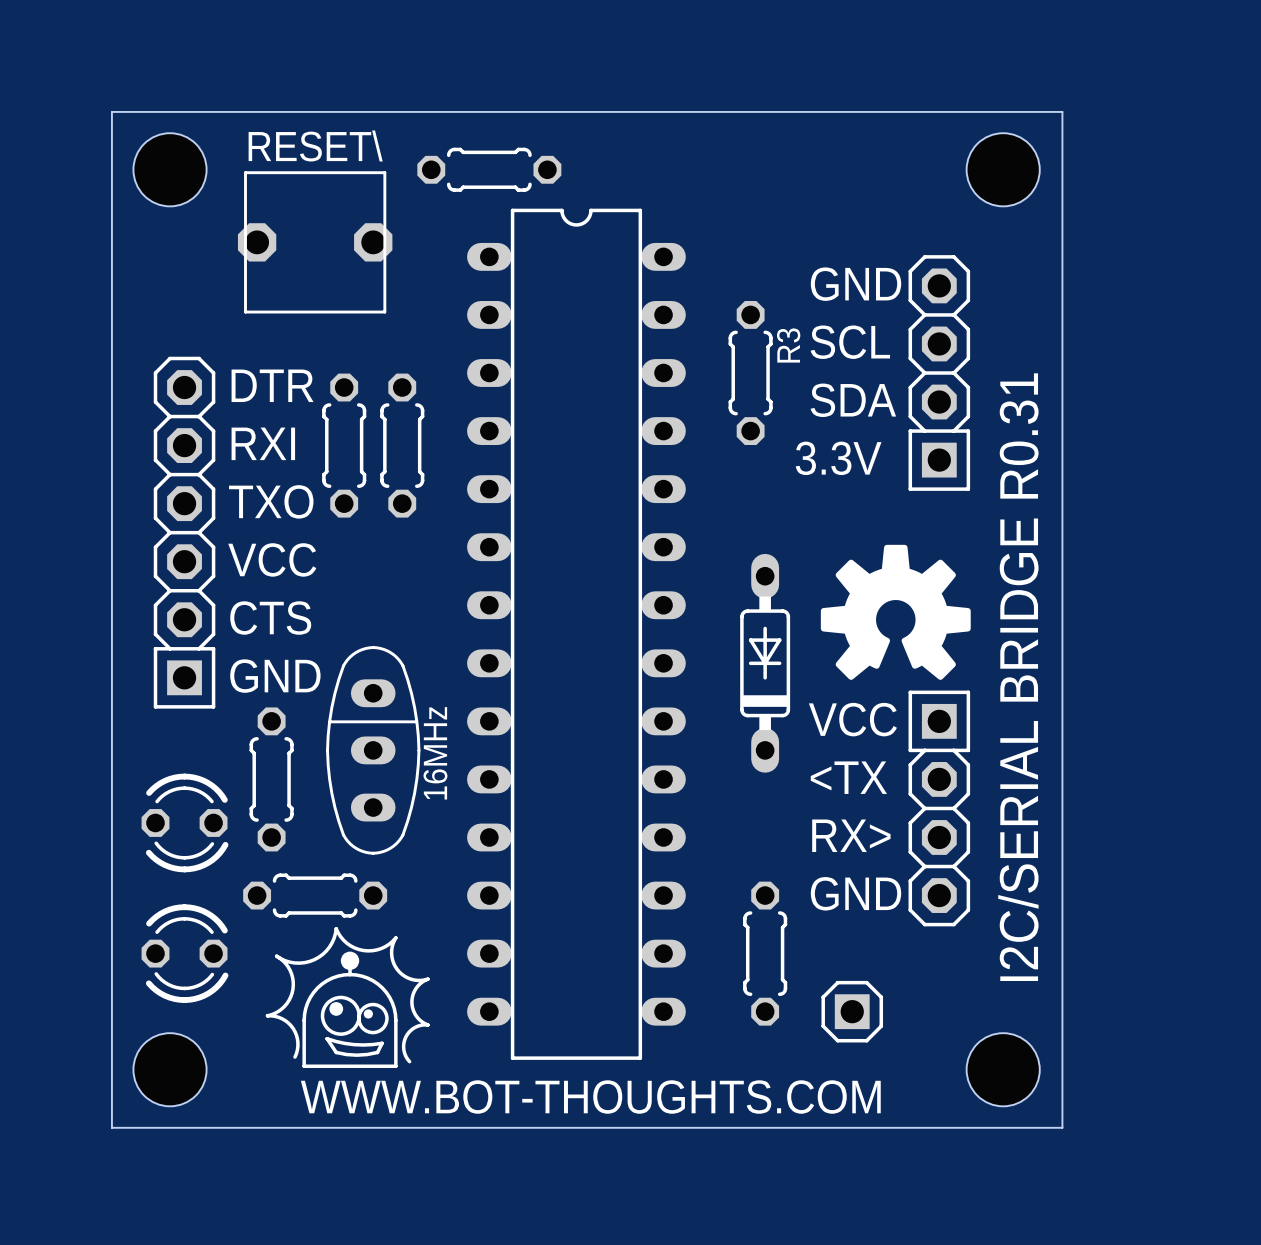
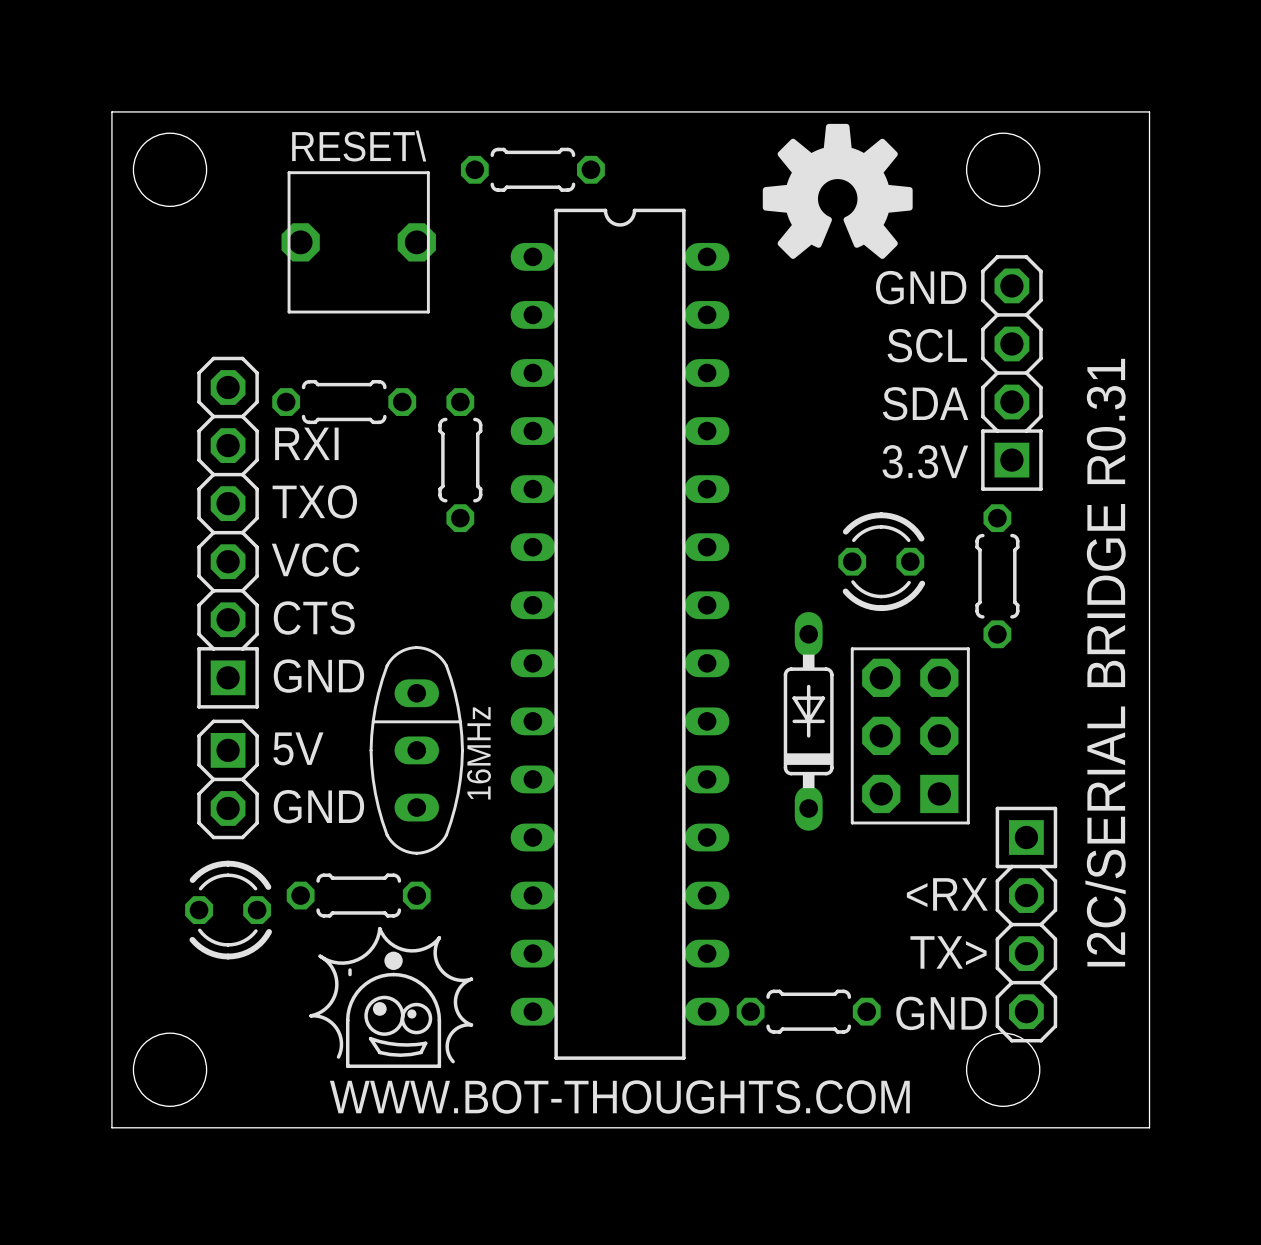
board edge: (1062, 111) (1062, 1127) -> (1062, 111) (1149, 111) (1149, 1127) (1062, 1127)
part position: (489, 169) -> (532, 169)
part position: (315, 242) -> (358, 242)
text position: GND (856, 284) -> GND (921, 287)
text position: SCL (850, 342) -> SCL (927, 345)
R3: (750, 373) -> none
part position: (939, 373) -> (1011, 373)
text: DTR (272, 385) -> none
text position: SDA (853, 400) -> SDA (925, 403)
part: none -> (344, 402)
text position: RXI (263, 443) -> RXI (306, 443)
part: (344, 445) -> none
part: (402, 445) -> none
text position: 3.3V (838, 458) -> 3.3V (925, 461)
part: none -> (460, 460)
text position: TXO (271, 501) -> TXO (314, 501)
part position: (184, 532) -> (228, 532)
text position: VCC (272, 559) -> VCC (315, 559)
part: none -> (881, 561)
part: none -> (997, 576)
drawing position: (895, 612) -> (837, 191)
text position: CTS (270, 618) -> CTS (314, 618)
part position: (576, 634) -> (619, 634)
part position: (765, 663) -> (808, 721)
text position: GND (275, 676) -> GND (318, 676)
text position: I2C/SERIAL BRIDGE R0.31 (1018, 677) -> I2C/SERIAL BRIDGE R0.31 (1105, 662)
text: VCC (852, 719) -> none
part: none -> (910, 735)
text: none -> 5V (298, 748)
part position: (373, 750) -> (416, 750)
text: <TX (848, 777) -> none
part: none -> (228, 779)
part: (271, 779) -> none
text: none -> GND (318, 806)
part position: (939, 808) -> (1026, 924)
part: (184, 822) -> none
text: RX> (851, 835) -> <RX (947, 894)
text position: GND (856, 893) -> GND (941, 1013)
part position: (315, 895) -> (358, 895)
part: none -> (228, 910)
text: none -> TX> (948, 952)
part: (184, 953) -> none
part rotation: 0° (765, 953) -> 90° clockwise (808, 1011)
drawing position: (350, 960) -> (393, 960)
drawing position: (336, 1008) -> (379, 1008)
part: (852, 1011) -> none
drawing position: (368, 1013) -> (411, 1013)
drawing position: (340, 1015) -> (384, 1015)
drawing position: (372, 1018) -> (416, 1018)
line: (327, 1038) (336, 1052) (346, 1054) (377, 1052) (382, 1043) (354, 1044) (327, 1038) -> (370, 1038) (379, 1052) (390, 1054) (421, 1052) (425, 1043) (397, 1044) (370, 1038)
line: (295, 1057) (297, 1042) (293, 1028) (282, 1018) (267, 1015) (284, 1006) (292, 989) (290, 970) (276, 956) (295, 963) (314, 959) (329, 947) (336, 928) (346, 943) (363, 950) (381, 948) (395, 937) (391, 954) (397, 969) (411, 979) (427, 979) (418, 985) (412, 996) (412, 1005) (414, 1013) (420, 1020) (427, 1024) (415, 1027) (405, 1036) (403, 1049) (409, 1061) -> (338, 1057) (341, 1042) (336, 1028) (325, 1018) (311, 1015) (327, 1006) (336, 989) (333, 970) (320, 956) (338, 963) (357, 959) (373, 947) (379, 928) (390, 943) (406, 950) (424, 948) (439, 937) (435, 954) (440, 969) (454, 979) (471, 979) (461, 985) (456, 996) (455, 1005) (458, 1013) (463, 1020) (471, 1024) (458, 1027) (449, 1036) (447, 1049) (453, 1061)
line: (347, 1066) (304, 1066) (304, 1020) (307, 1002) (317, 987) (332, 978) (350, 974) (361, 976) (372, 980) (382, 987) (389, 997) (395, 1014) (395, 1066) -> (347, 1066) (348, 1014) (353, 997) (361, 987) (370, 980) (381, 976) (393, 974) (411, 978) (425, 987) (435, 1002) (439, 1020) (439, 1066) (395, 1066)
text position: WWW.BOT-THOUGHTS.COM (590, 1097) -> WWW.BOT-THOUGHTS.COM (619, 1097)

